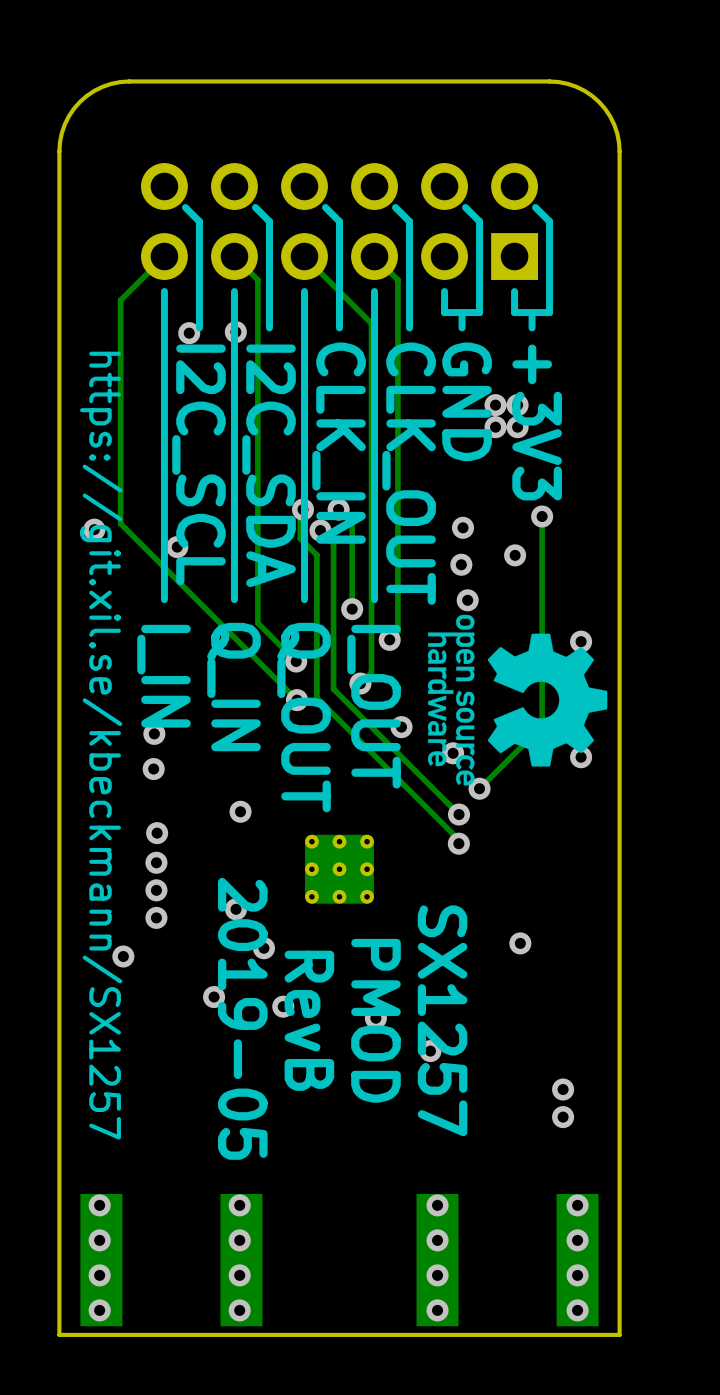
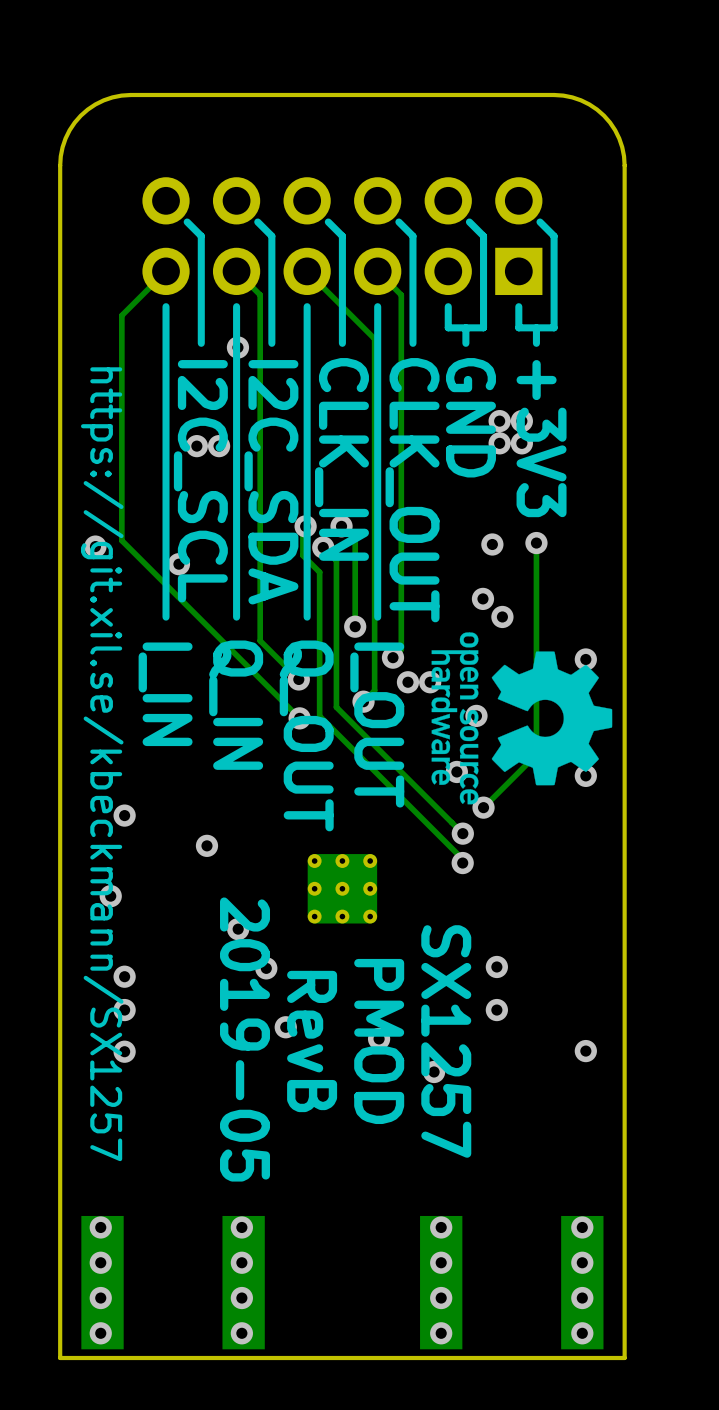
via: (189, 333) -> none
via: none -> (196, 446)
via: none -> (219, 446)
track: (542, 516) (542, 726) (532, 736) -> (536, 543) (536, 754)
via position: (542, 516) -> (536, 543)
via: (463, 527) -> none
via: none -> (492, 544)
via: (515, 555) -> none
via: (461, 564) -> none
via: none -> (482, 598)
via: none -> (502, 616)
via: (467, 600) -> none
via: none -> (407, 682)
via: none -> (430, 682)
via: none -> (476, 715)
via: (401, 727) -> none
via: (154, 733) -> none
via: (153, 769) -> none
via: none -> (124, 815)
via: (240, 811) -> none
via: none -> (206, 845)
via: (157, 833) -> none
via: (156, 862) -> none
via: none -> (110, 896)
via: (156, 890) -> none
via: (156, 917) -> none
via: (520, 943) -> none
via: none -> (496, 966)
via: none -> (124, 1010)
via: none -> (496, 1010)
via: (214, 997) -> none
via: none -> (124, 1051)
via: none -> (585, 1051)
via: (563, 1089) -> none
via: (563, 1117) -> none

